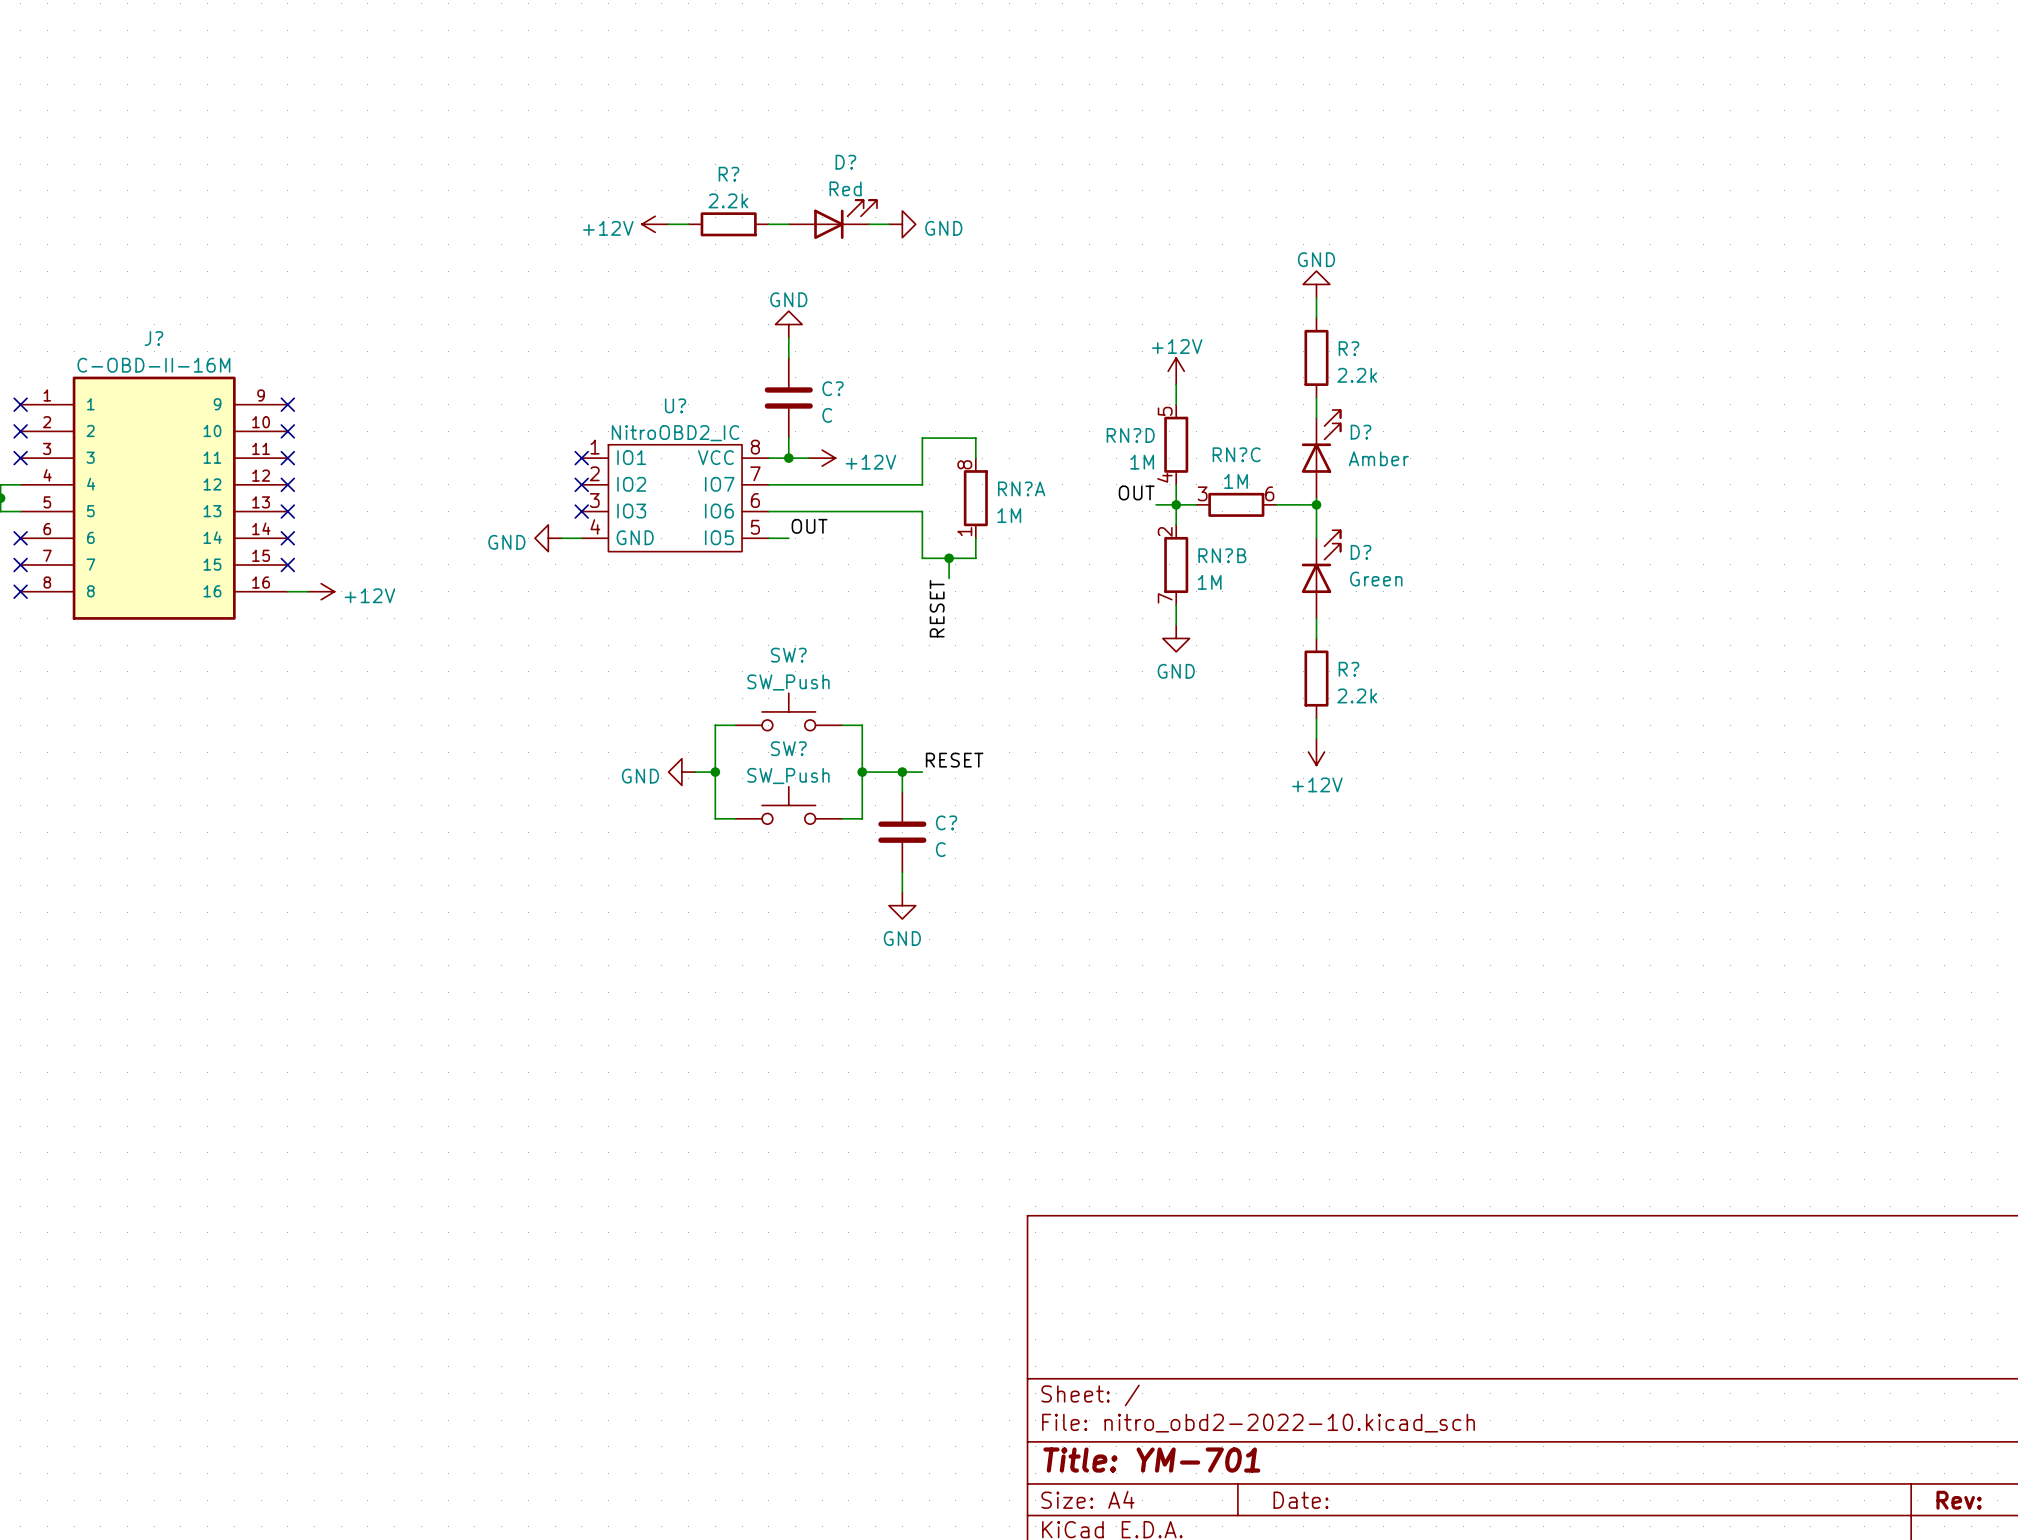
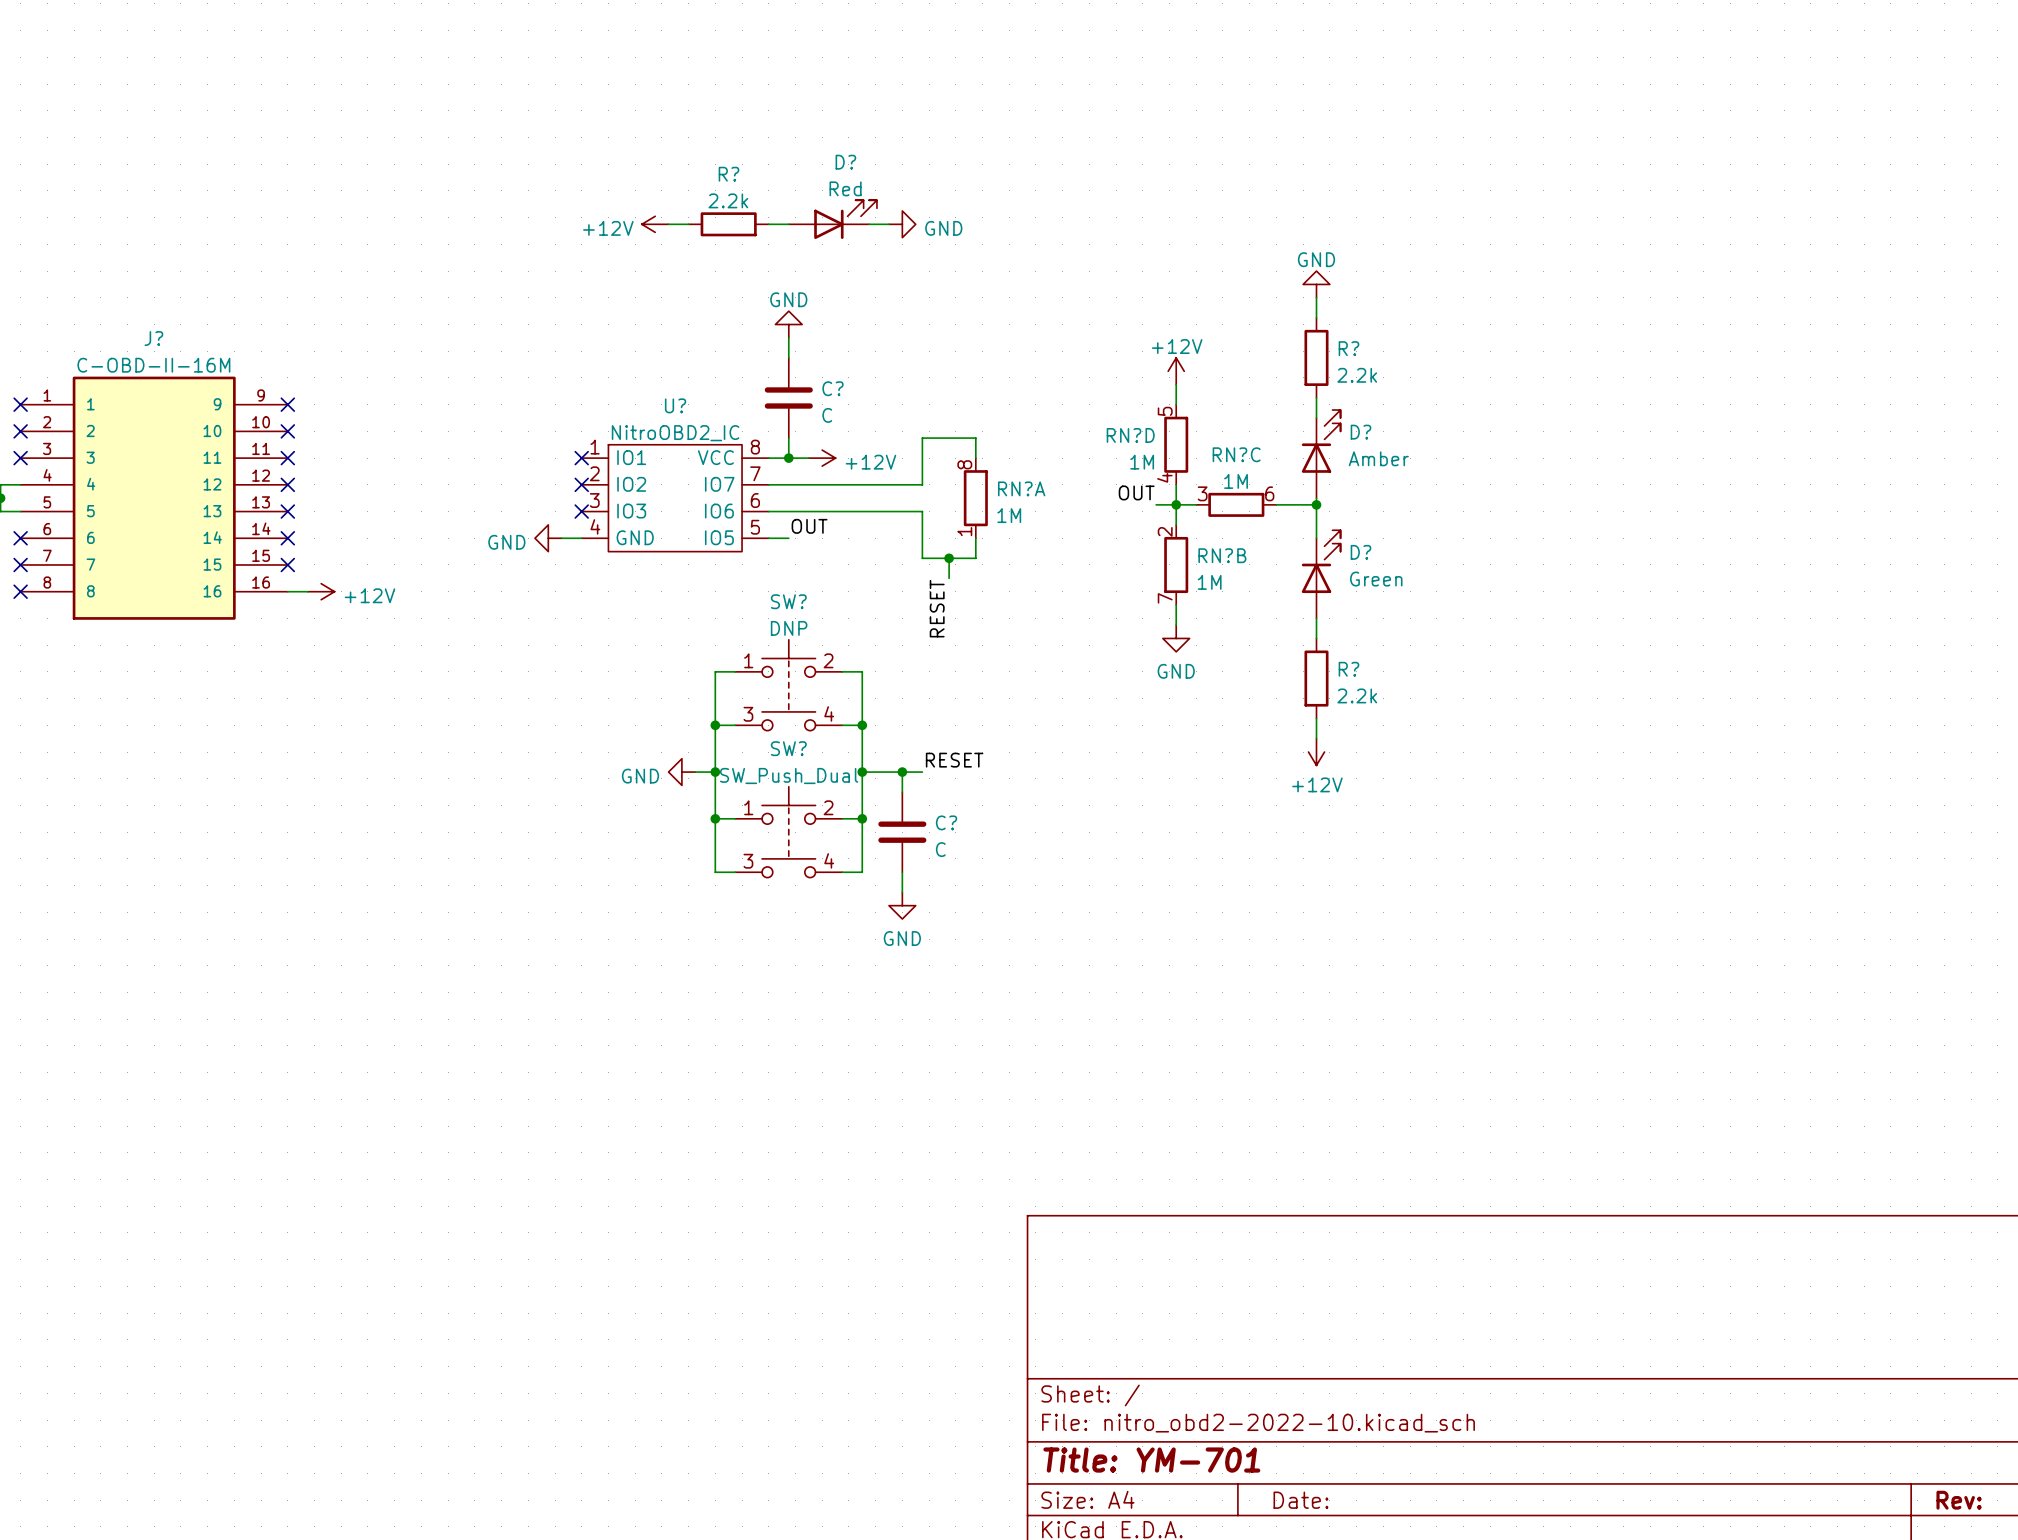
wire: none -> (735, 671) (715, 671) (715, 725)
wire: none -> (842, 671) (862, 671) (862, 725)
SW?: none -> DNP (788, 685)
SW?: SW_Push (788, 711) -> none
junction: none -> (715, 725)
junction: none -> (862, 725)
SW?: SW_Push (788, 805) -> none
wire: none -> (715, 818) (715, 872) (735, 872)
junction: none -> (715, 818)
wire: none -> (862, 818) (862, 872) (842, 872)
junction: none -> (862, 818)
SW?: none -> SW_Push_Dual (788, 832)

